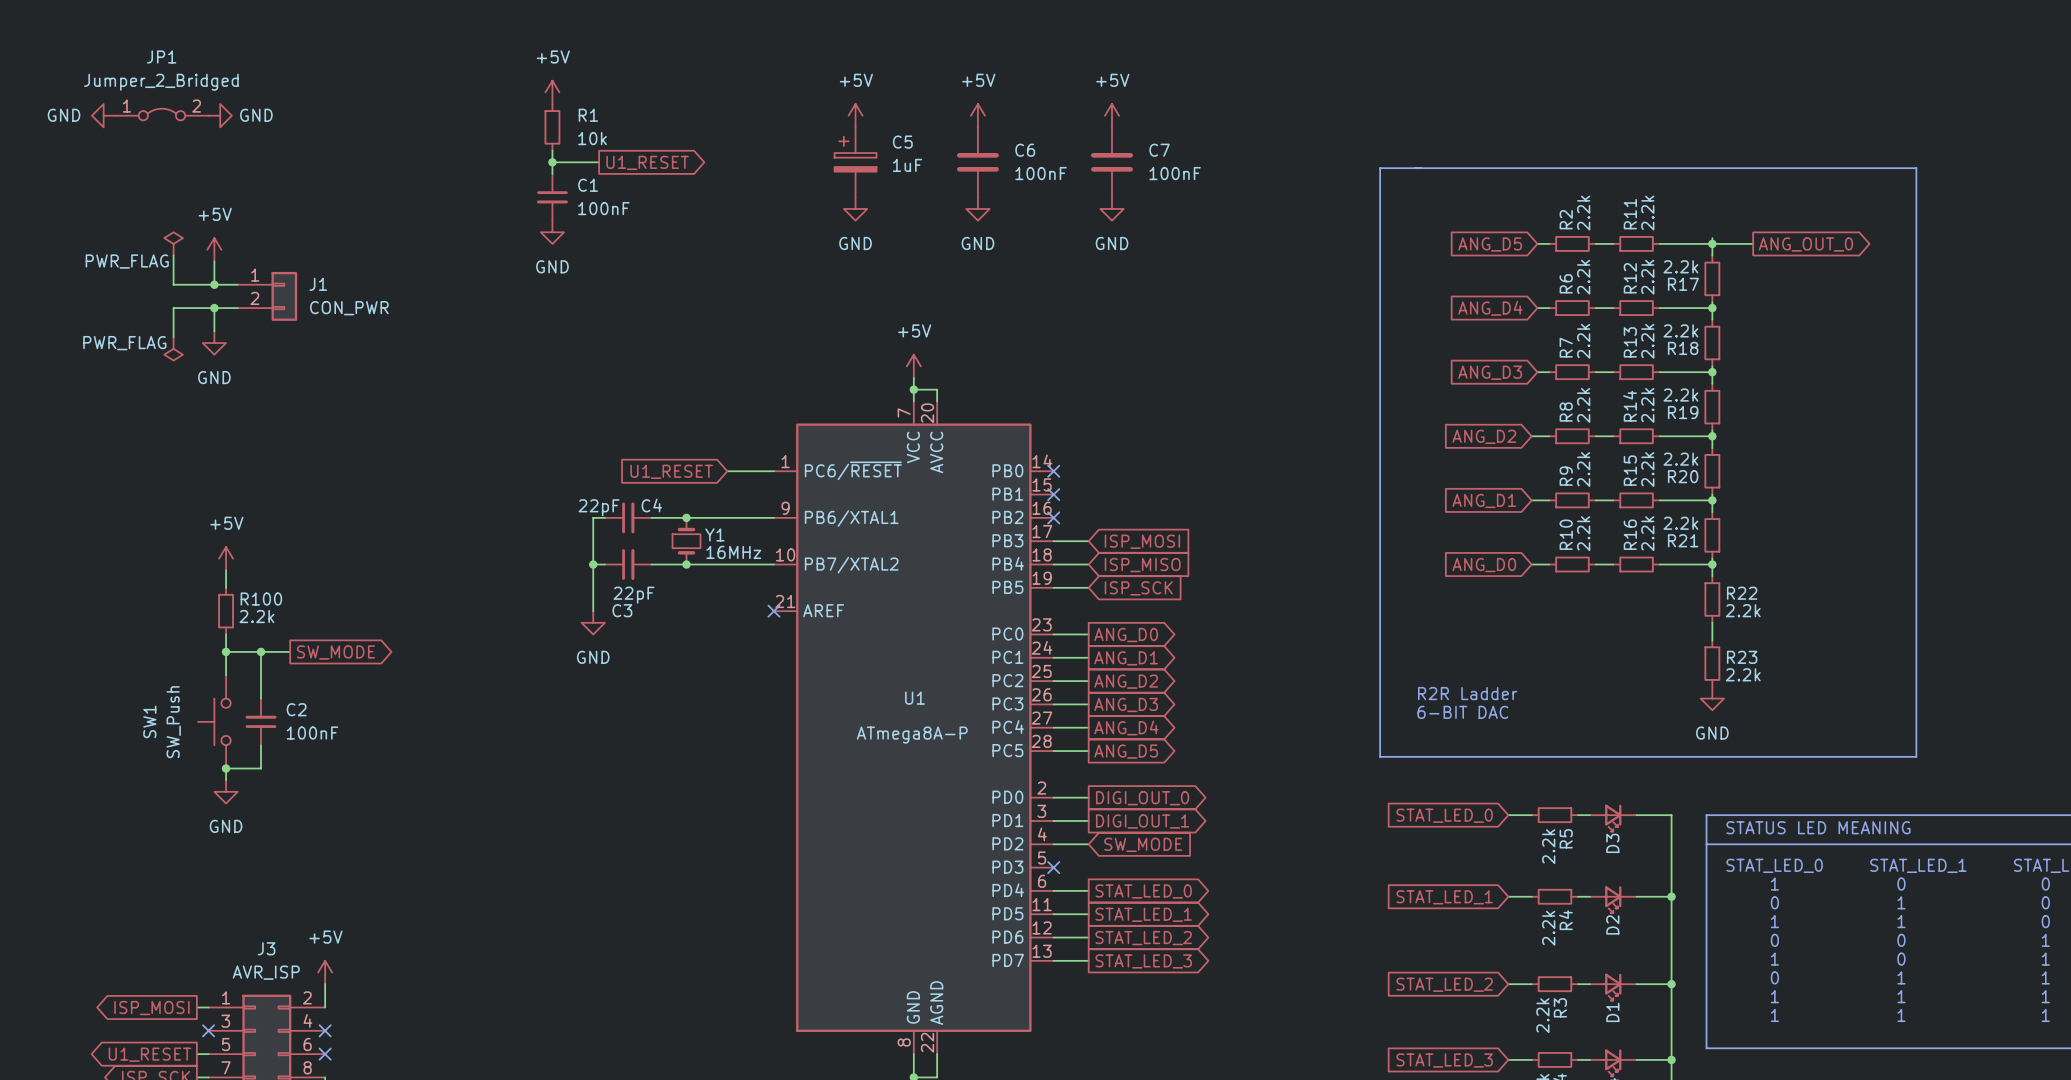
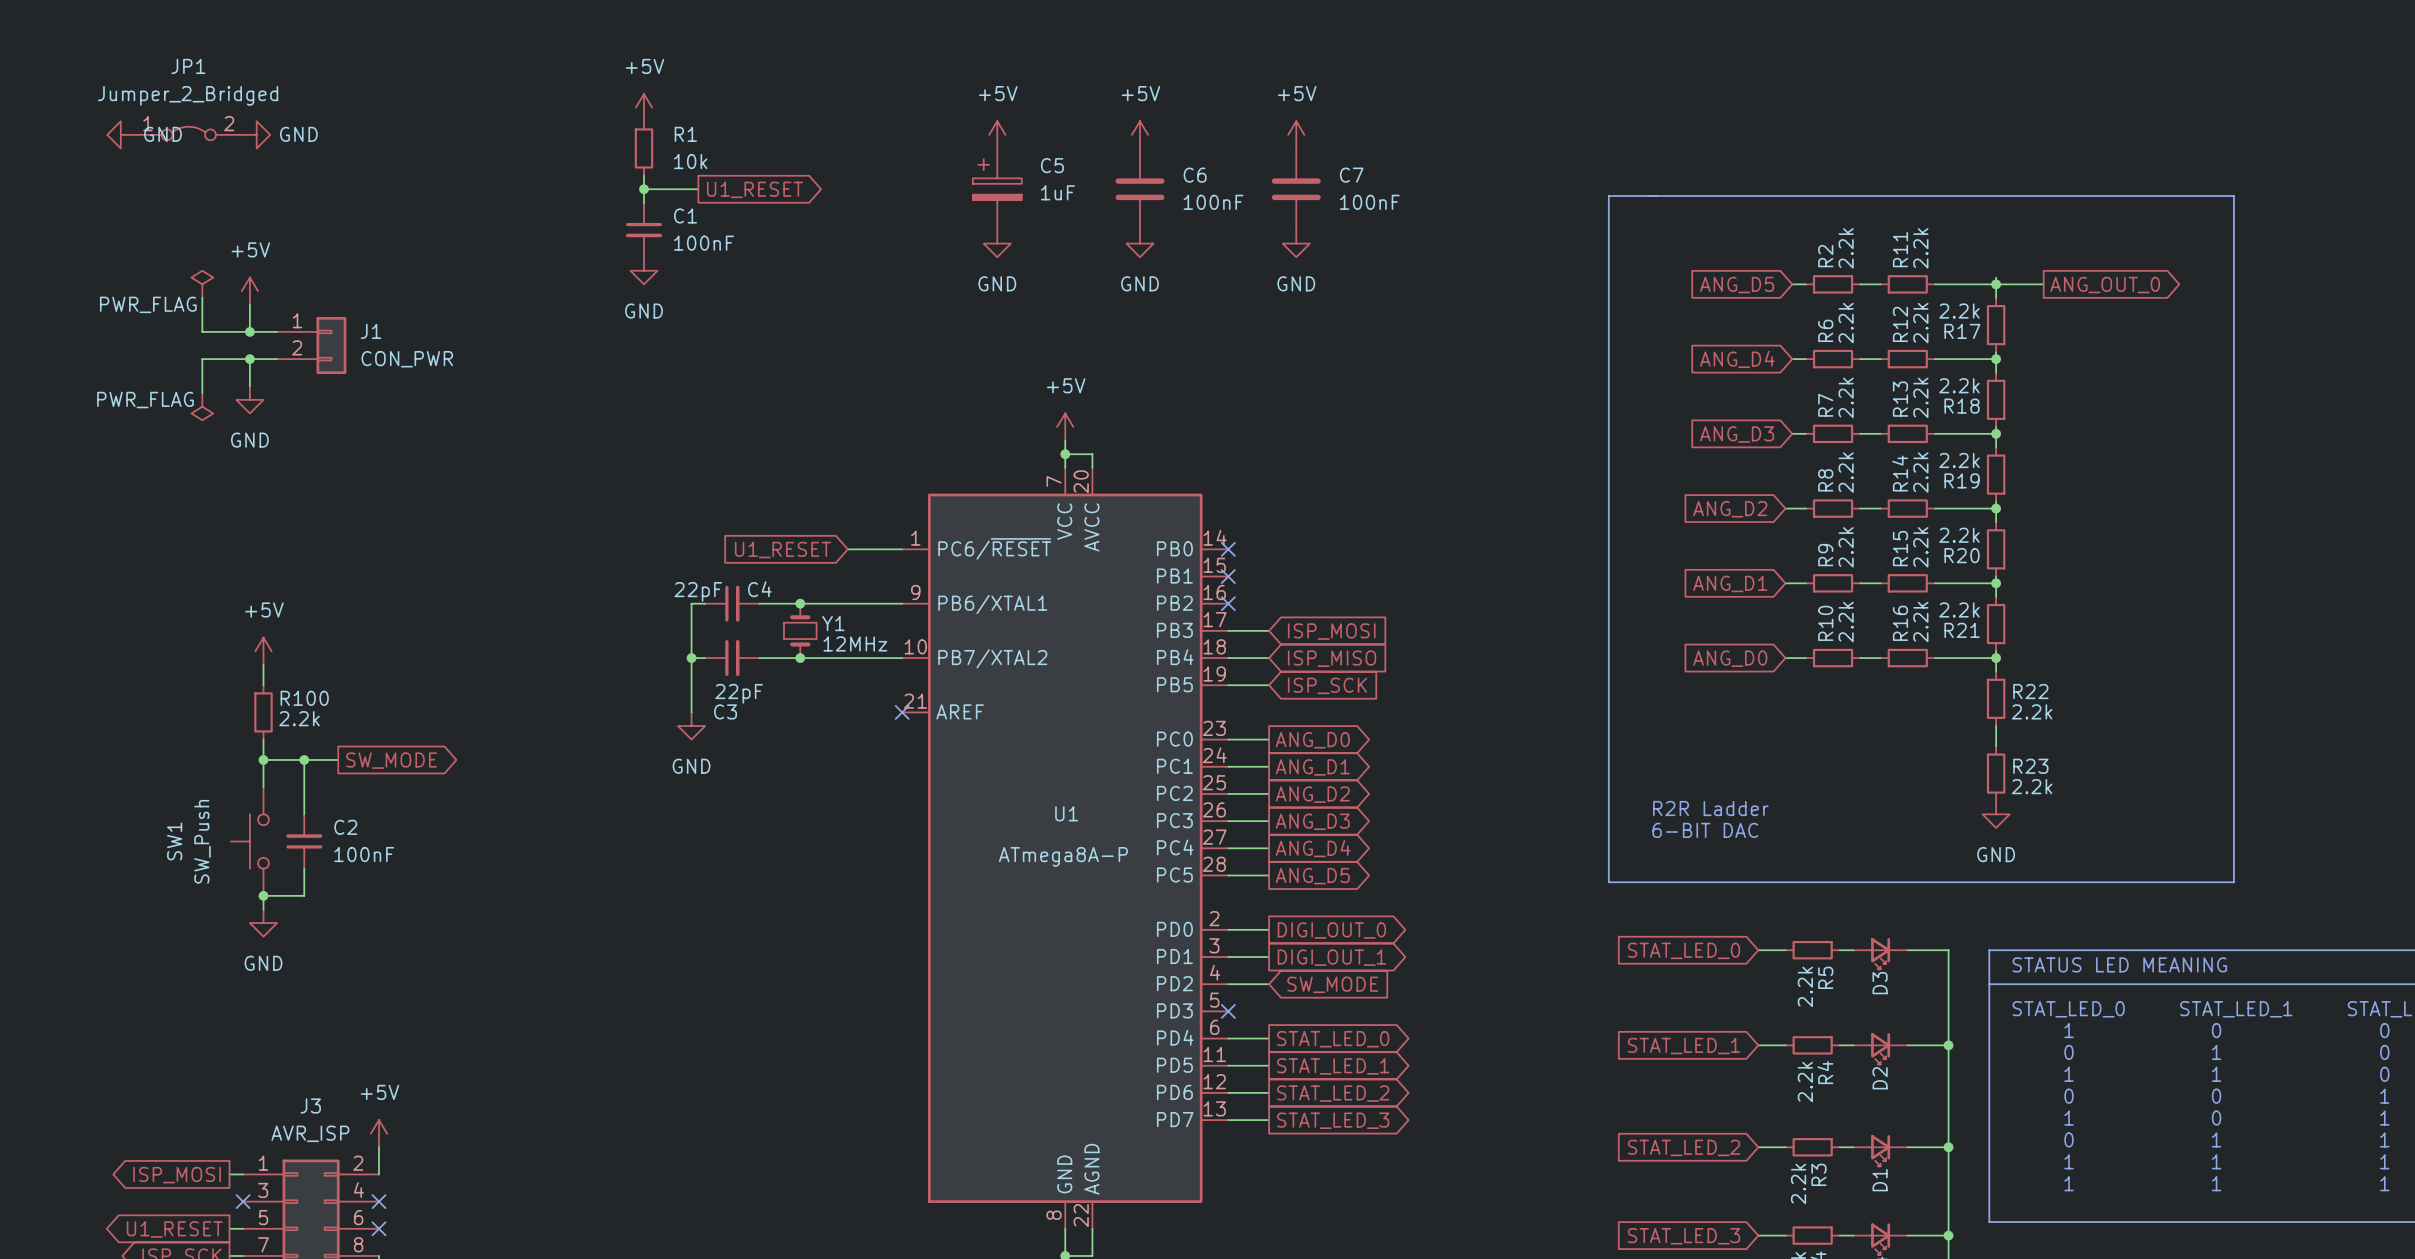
power symbol text position: GND (64, 115) -> GND (162, 134)
Y1 value: 16MHz (733, 552) -> 12MHz (855, 643)

